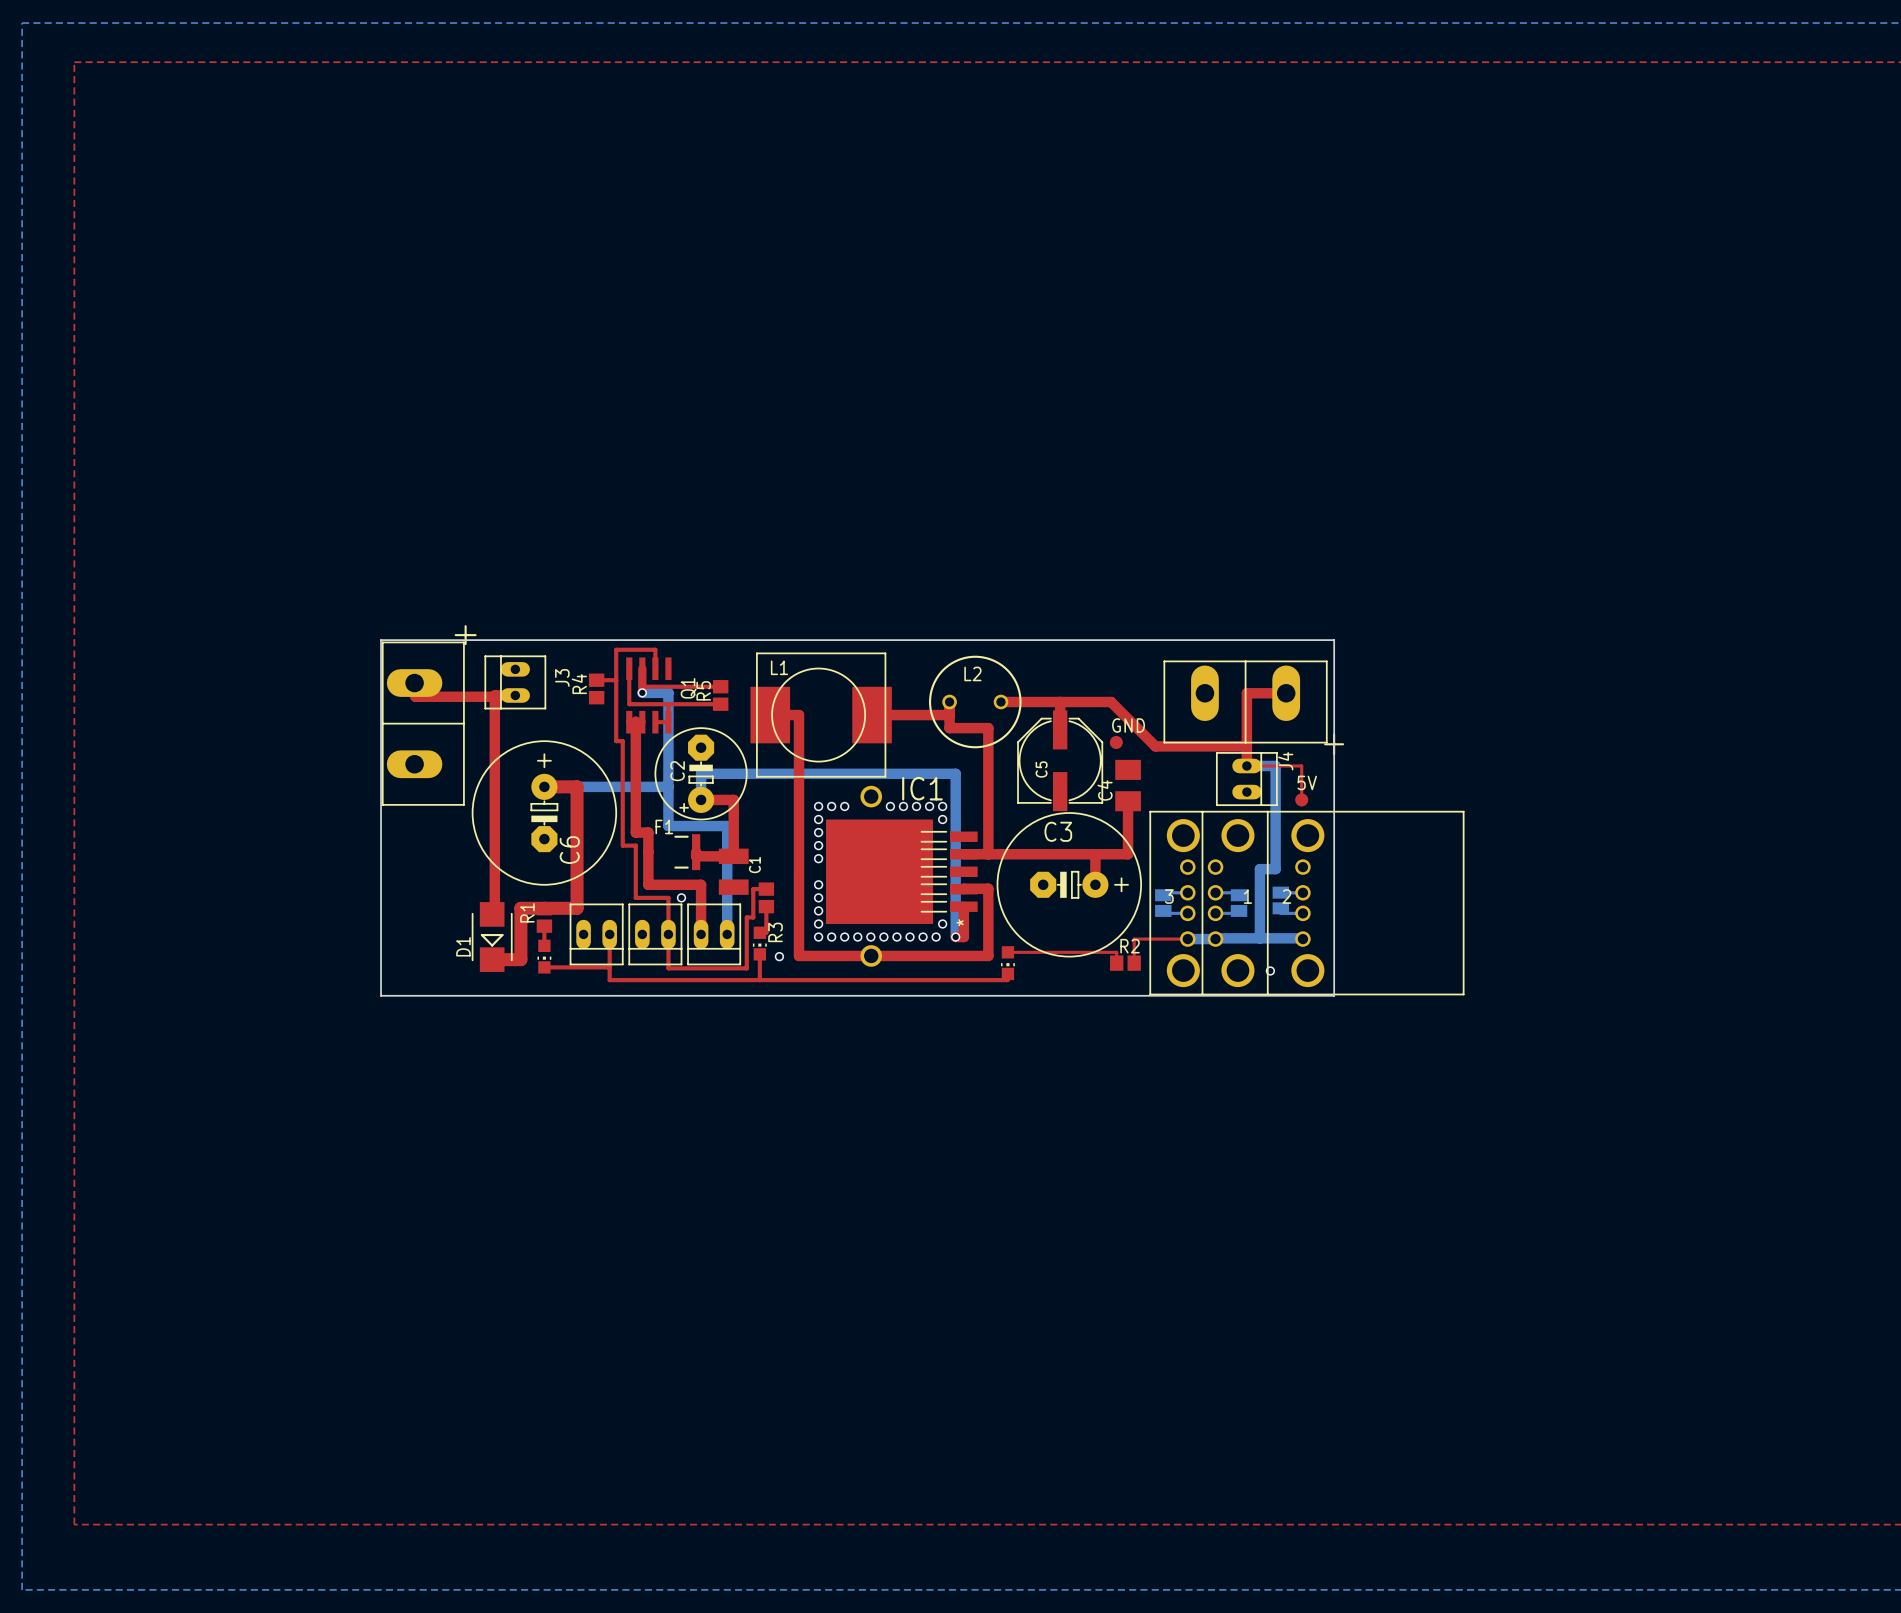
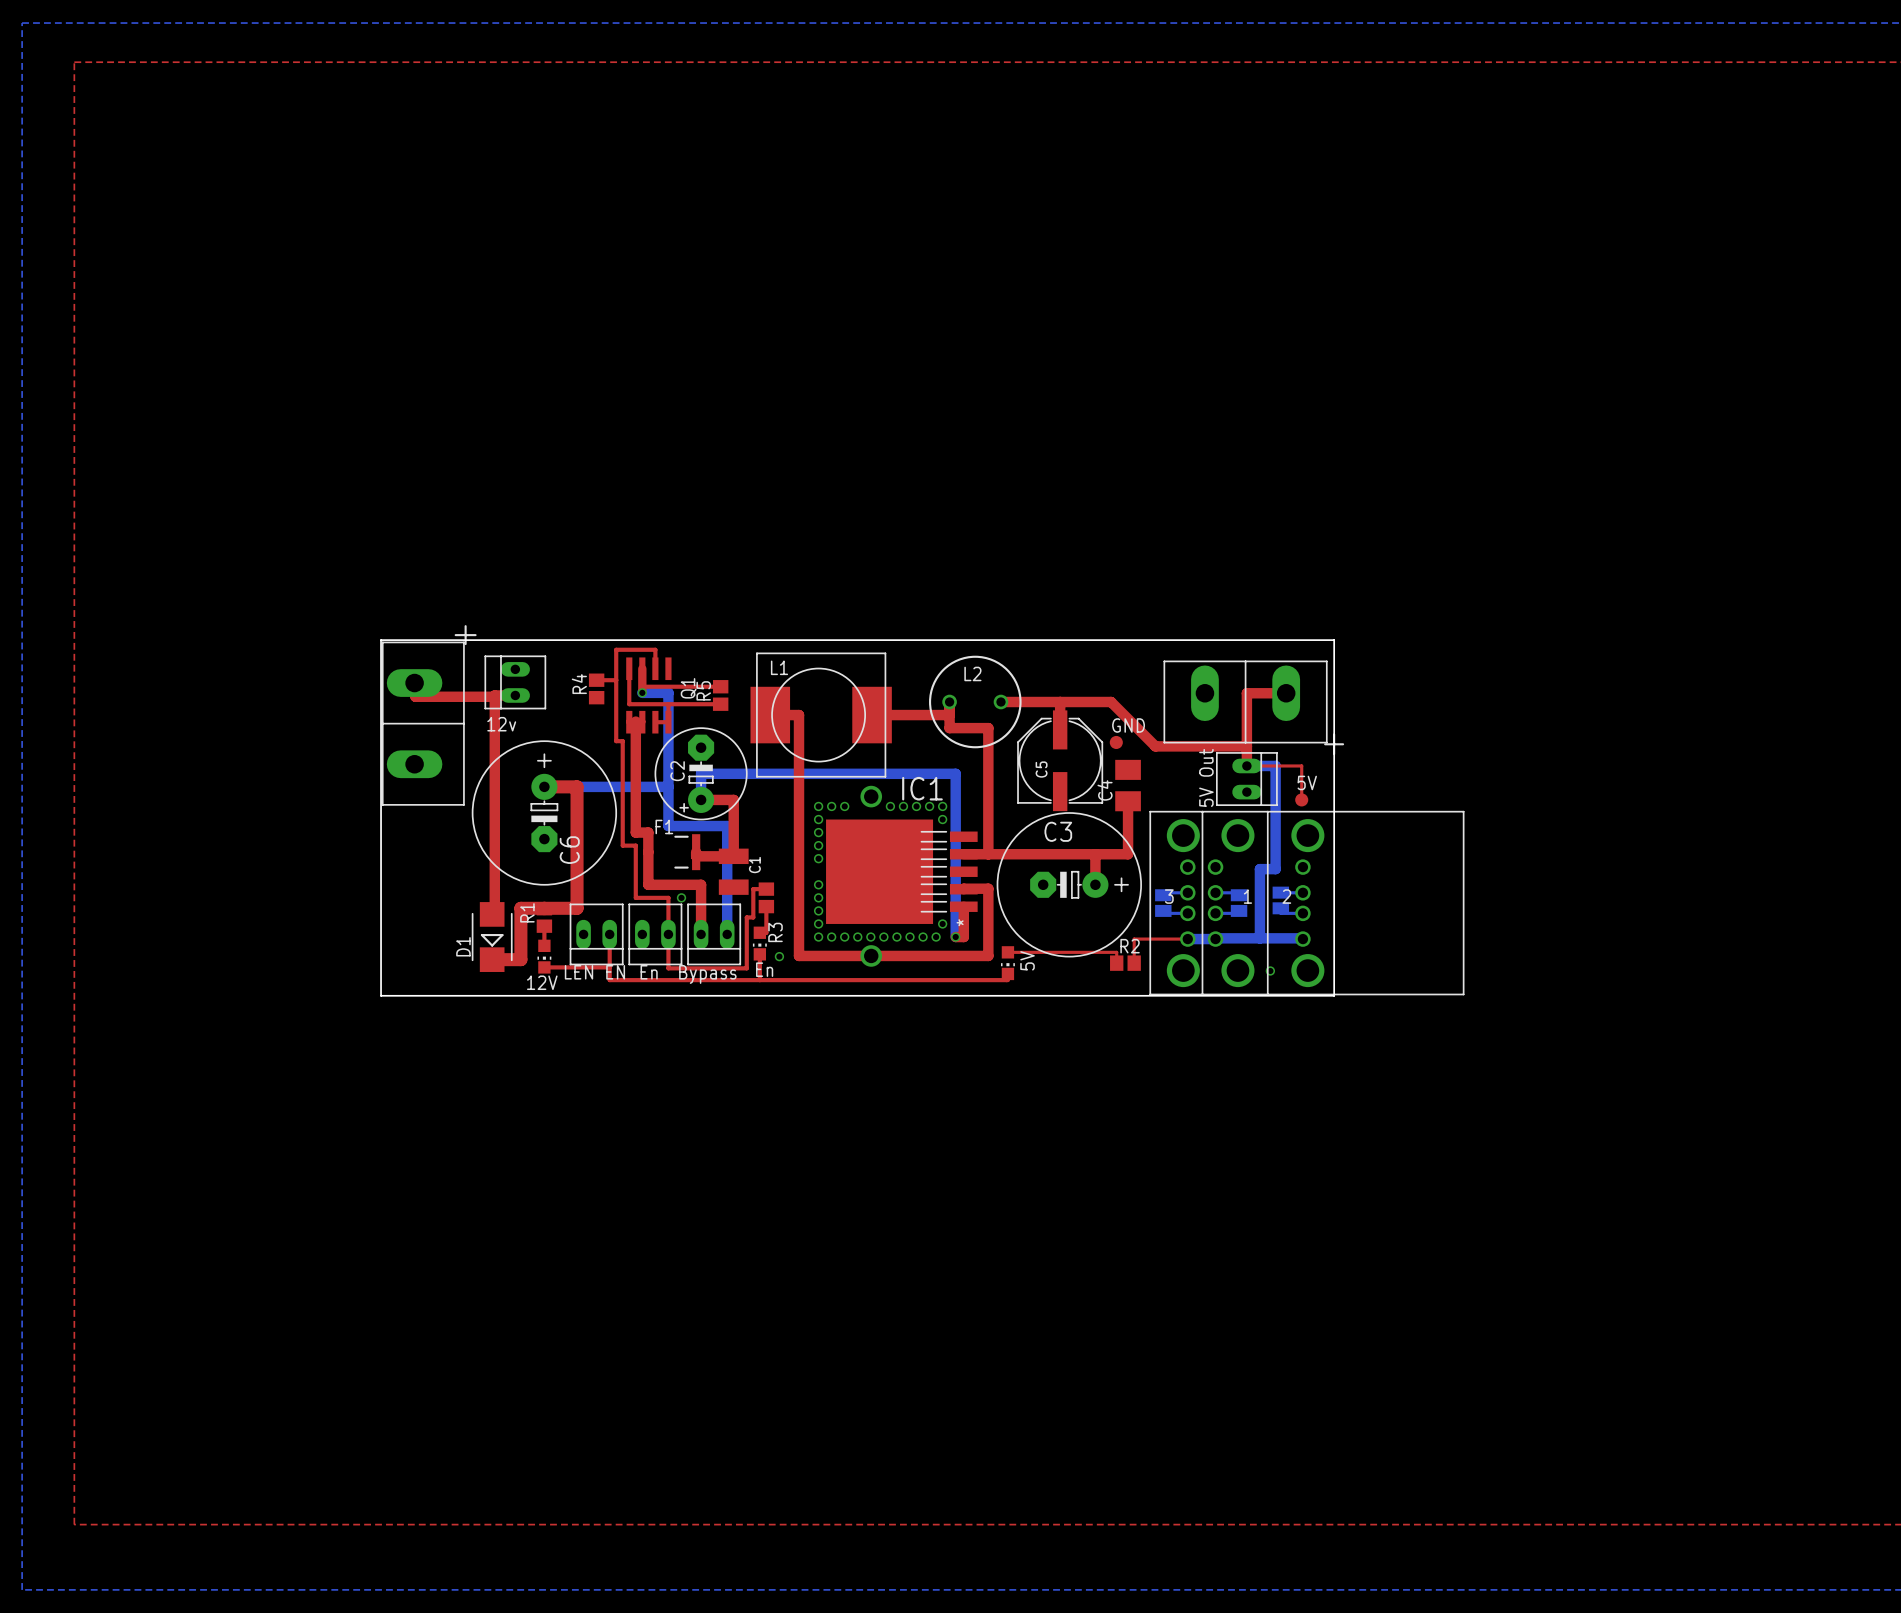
J3 name: J3 (562, 677) -> none
J3 value: none -> 12v (501, 724)
J4 name: J4 (1285, 761) -> none
J4 value: none -> 5V Out (1206, 777)
part value: none -> 5V (1027, 960)
part value: none -> En (764, 969)
part value: none -> LEN EN (594, 972)
part value: none -> En (649, 972)
part value: none -> Bypass (707, 974)
part value: none -> 12V (542, 982)

